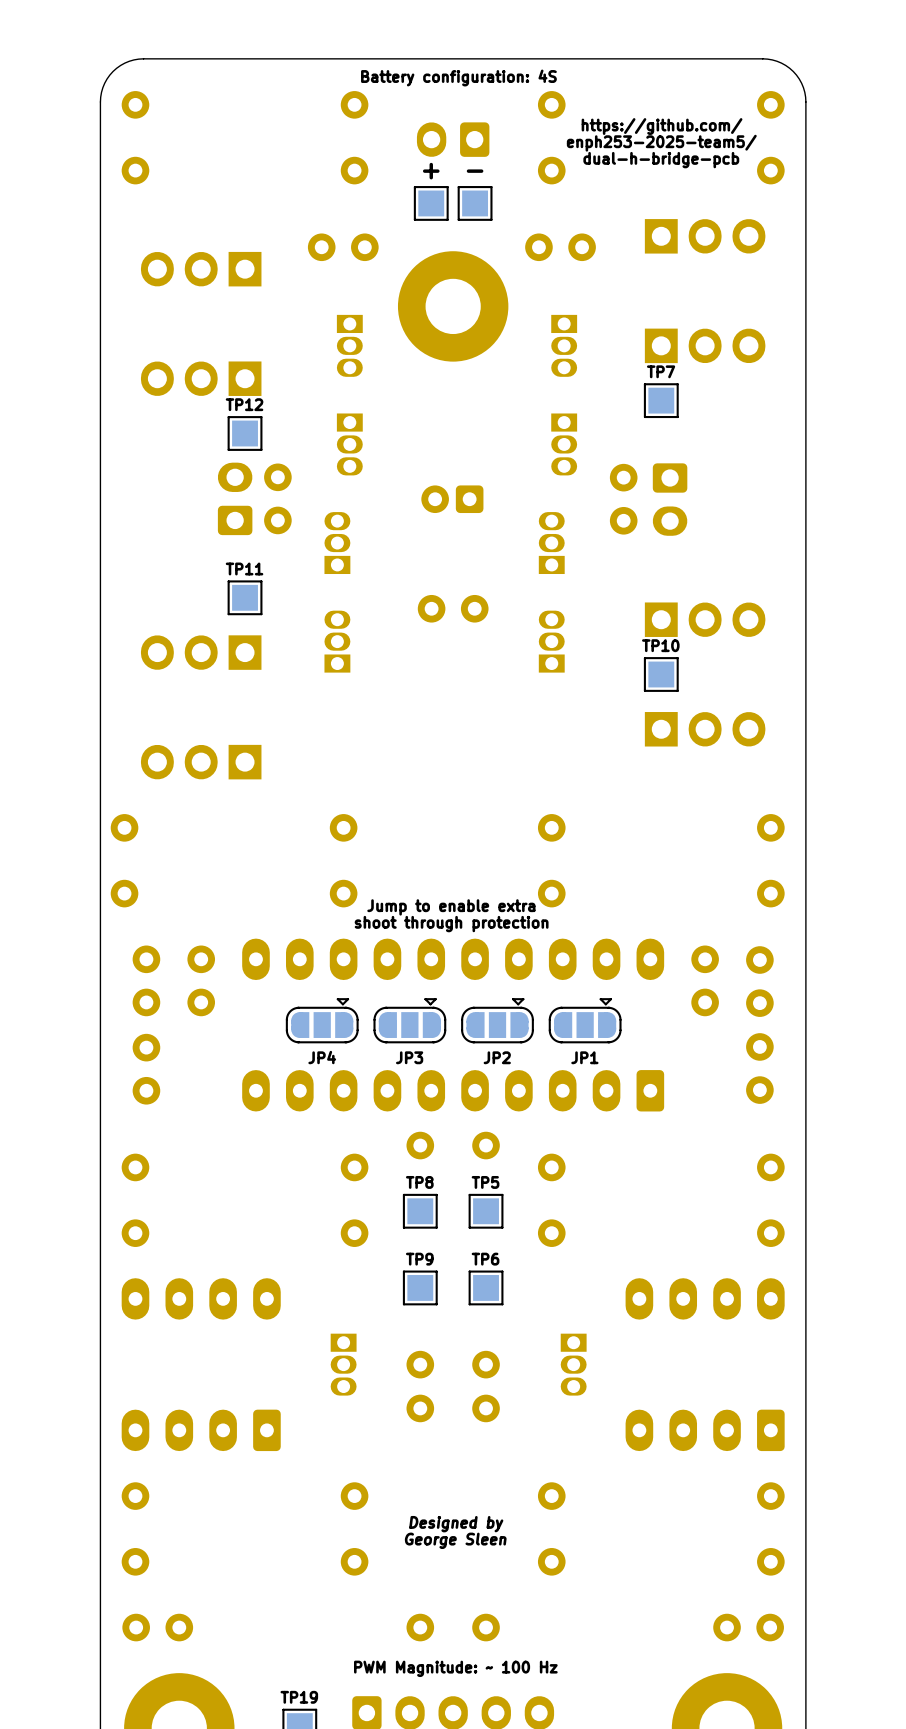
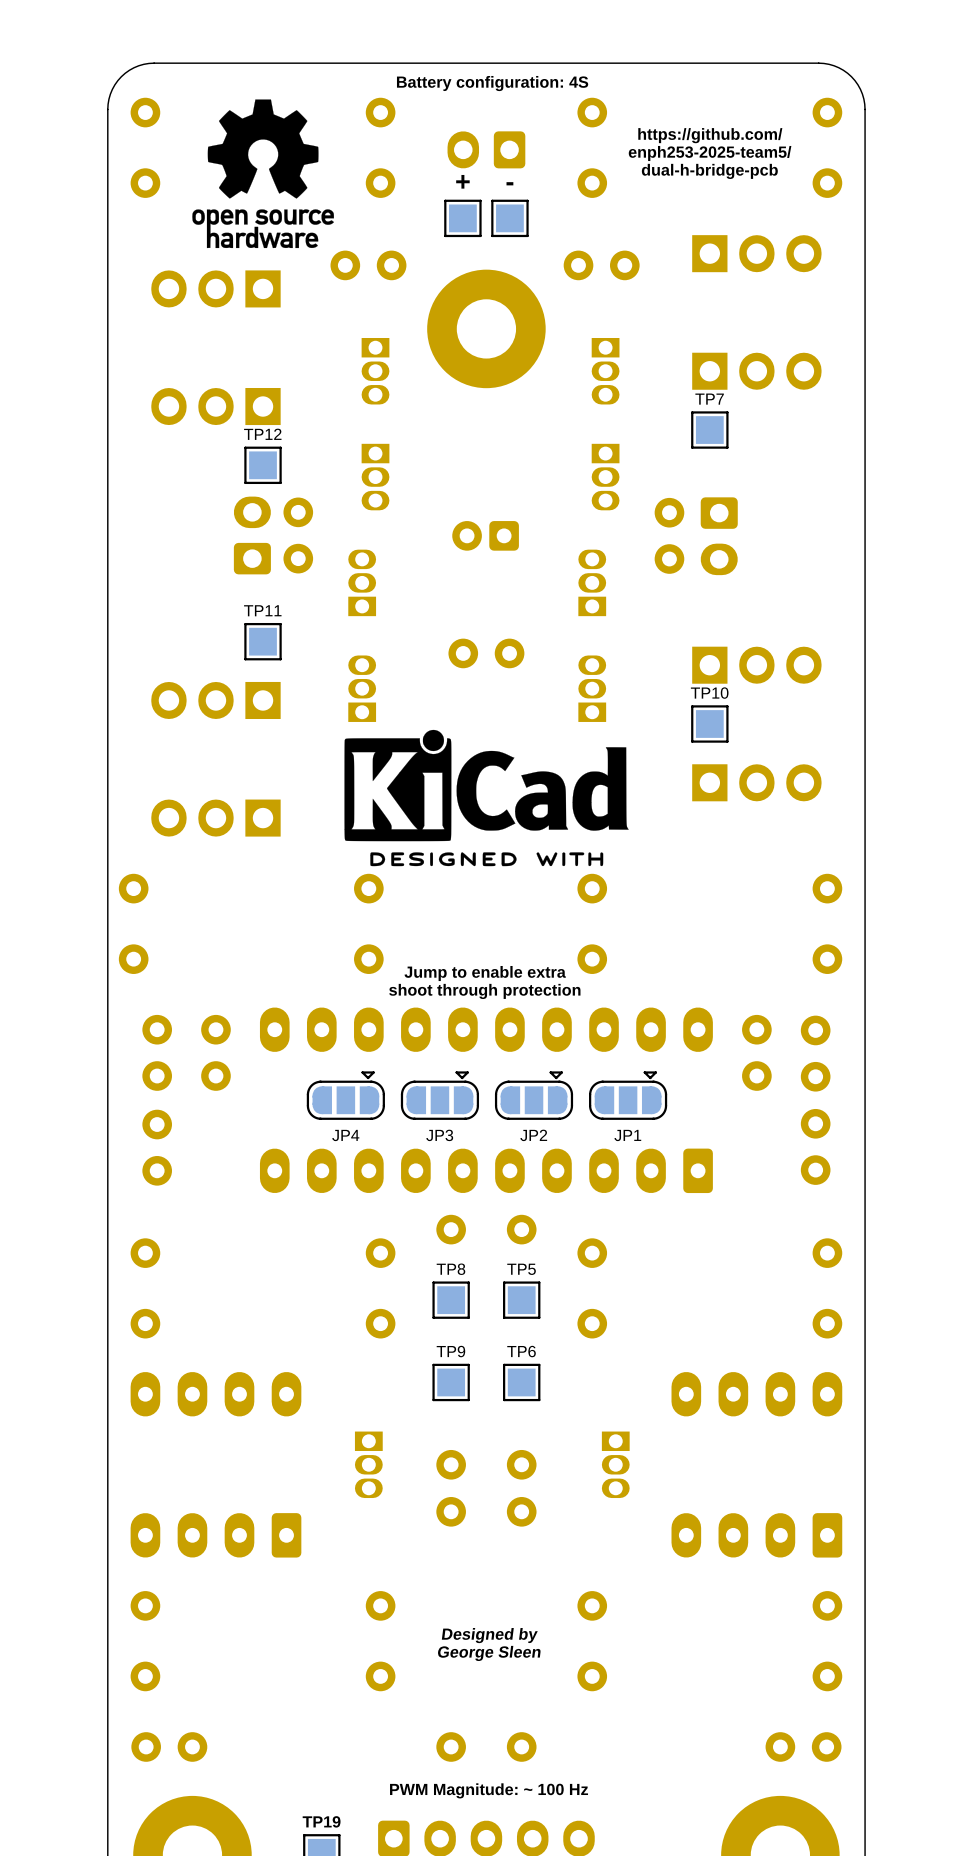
drawing: none -> [192, 99, 334, 249]
drawing: none -> [344, 729, 629, 867]

